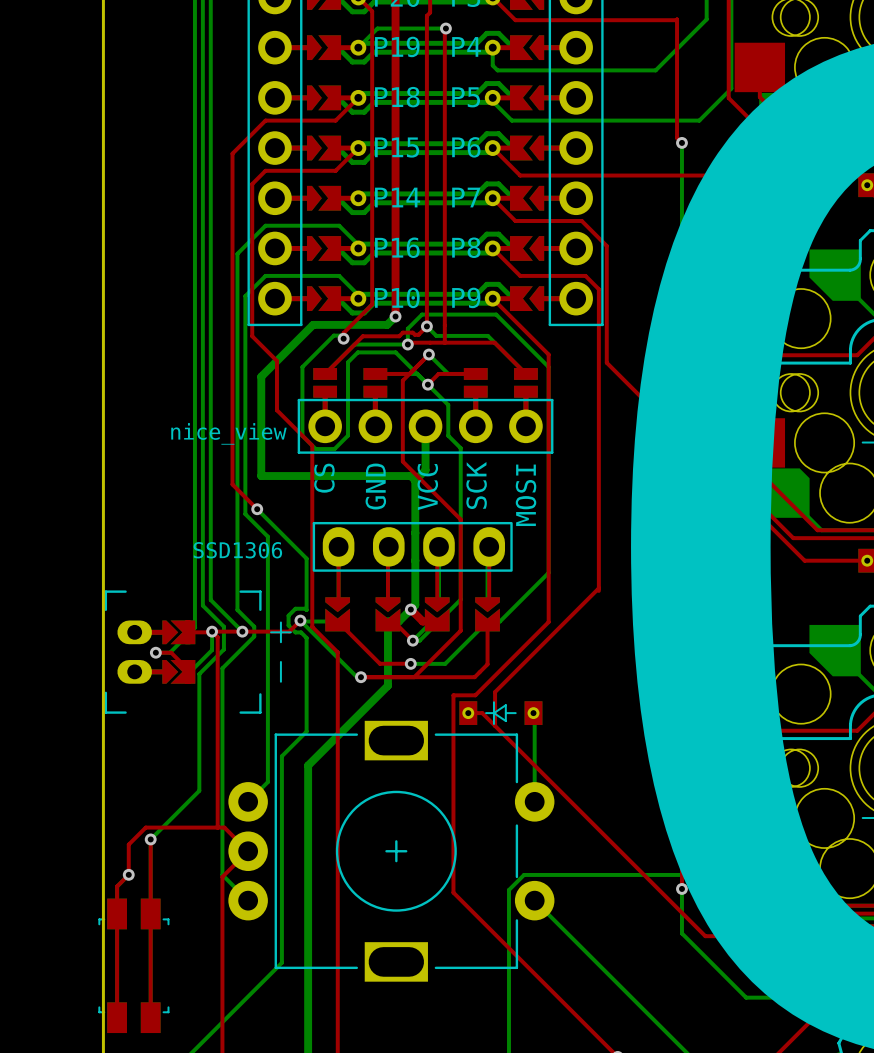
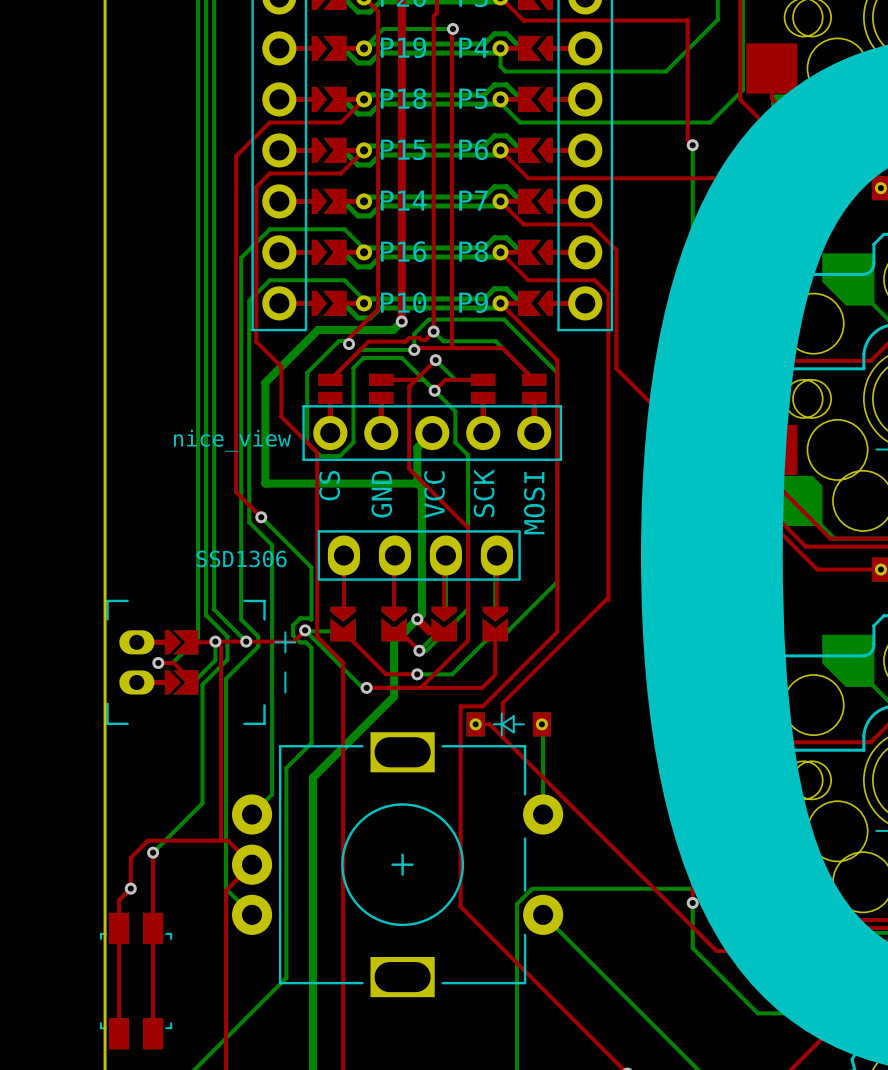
bottom track: none -> (432, 433) (417, 447) (417, 483)
bottom track: (426, 427) (425, 470) (415, 480) -> none

